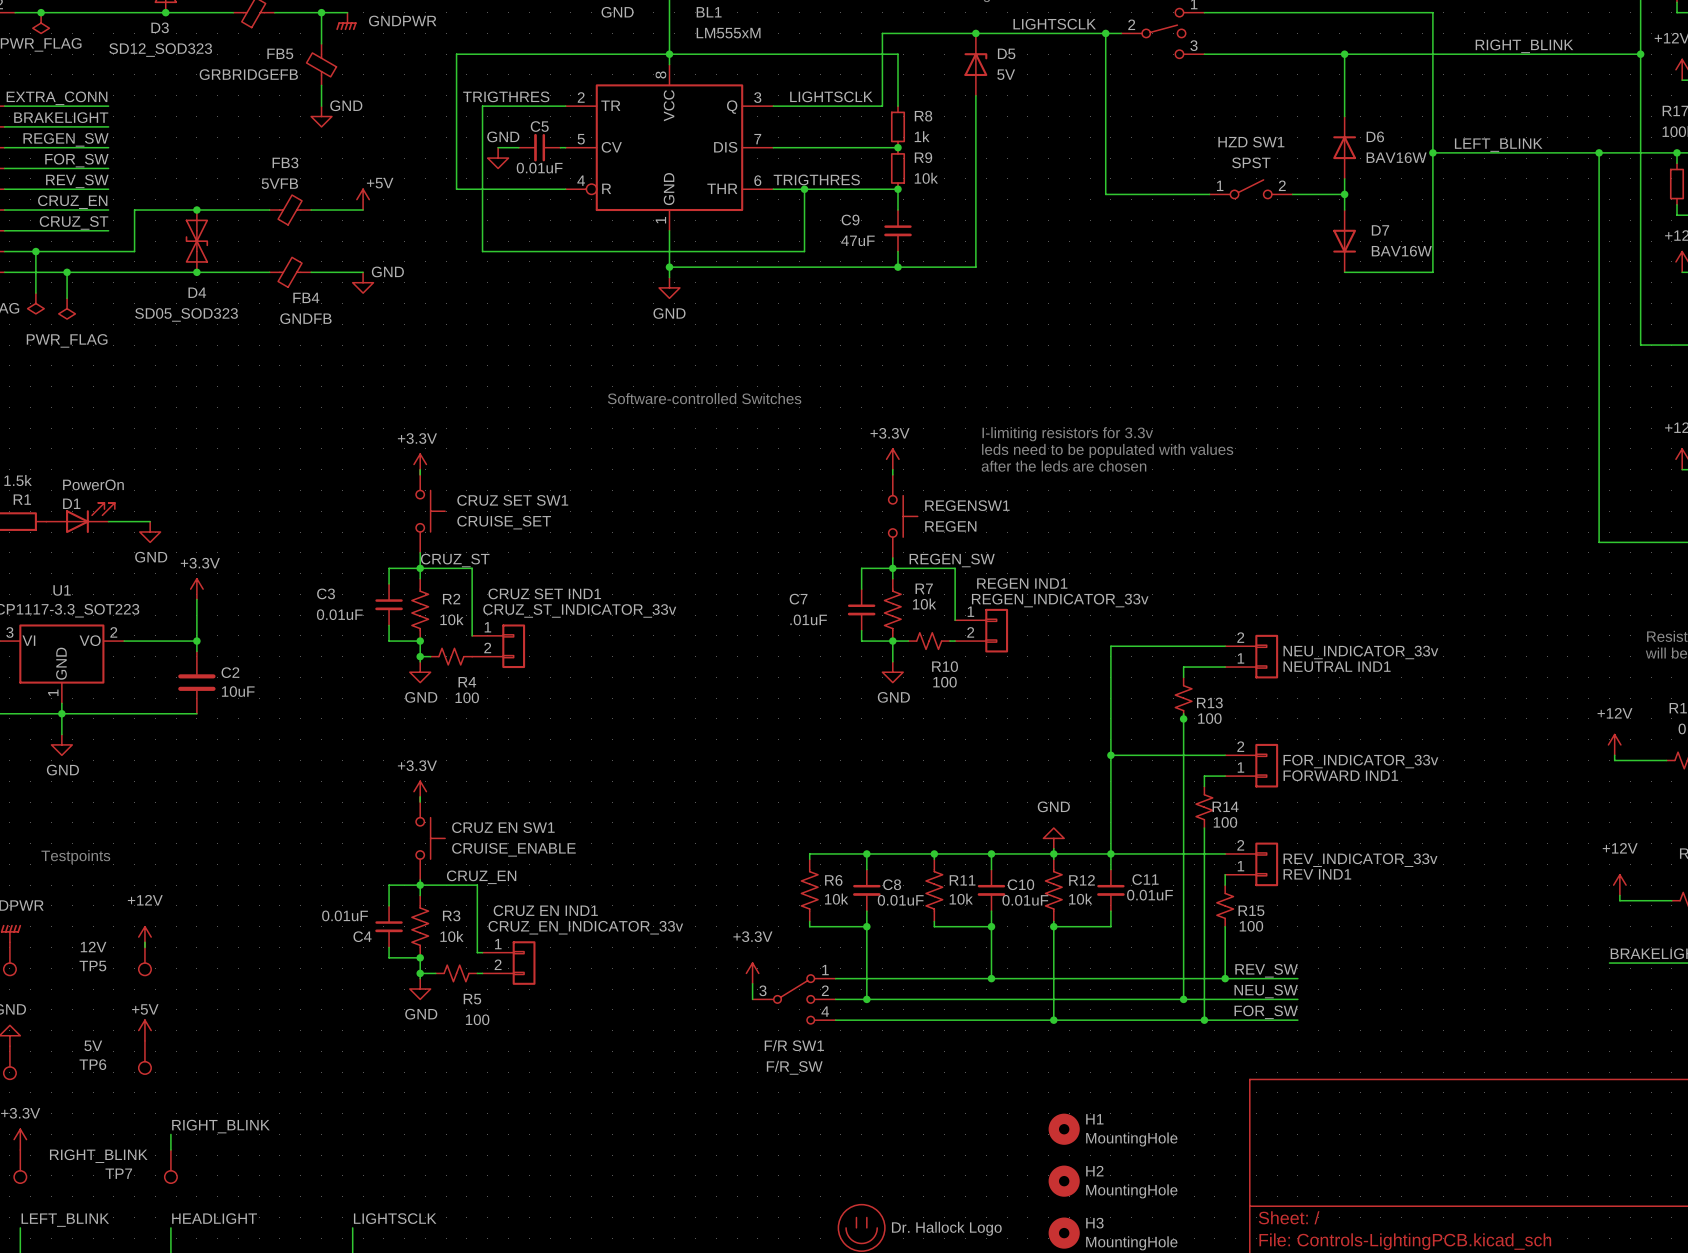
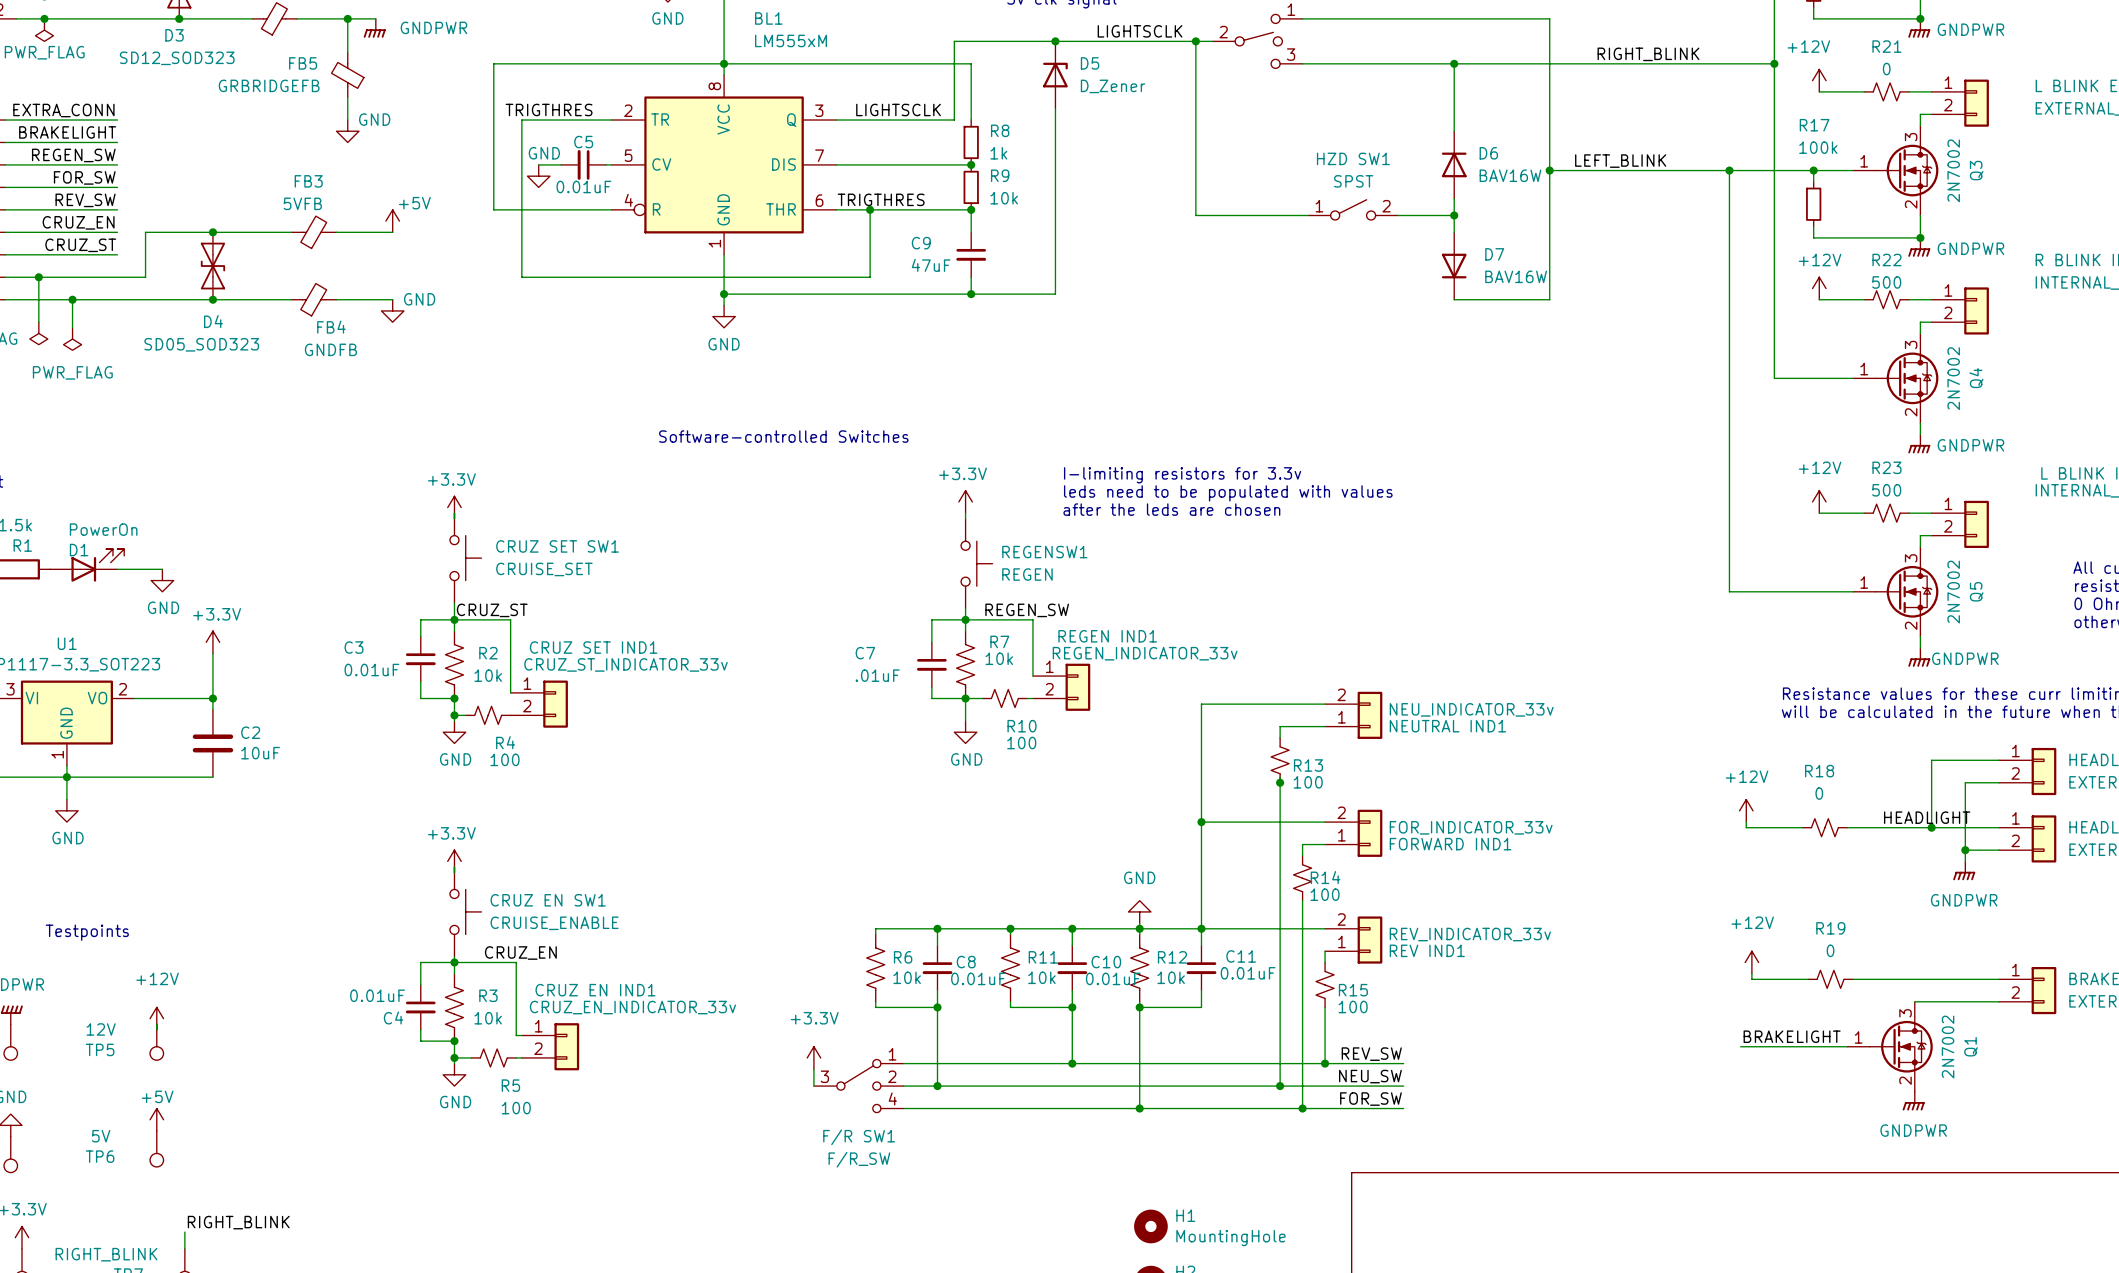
D5 value: 5V (1006, 74) -> D_Zener (1113, 86)

